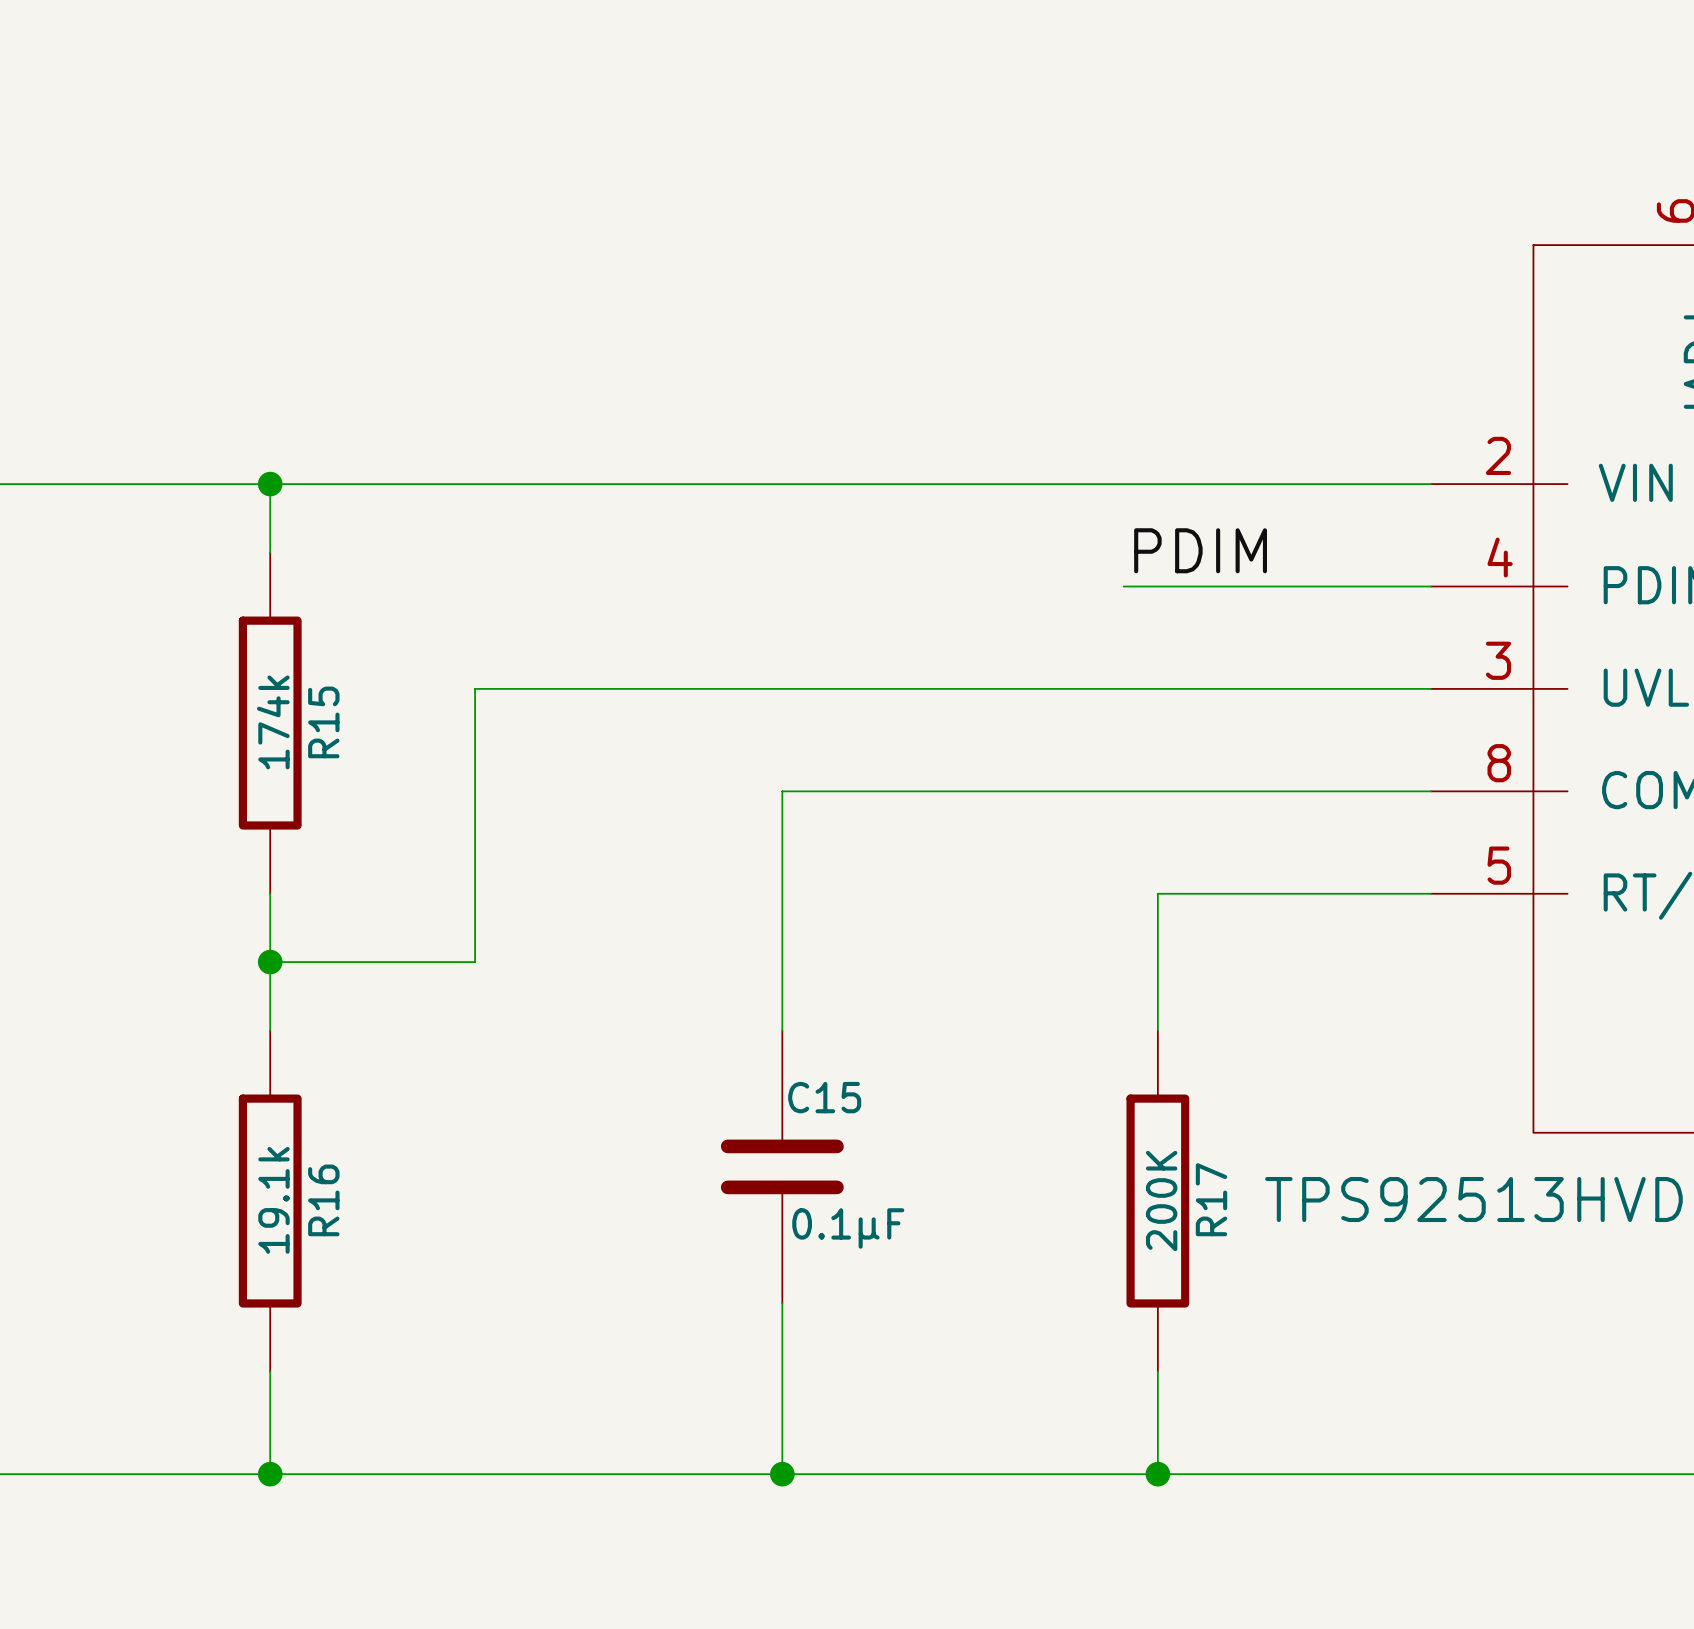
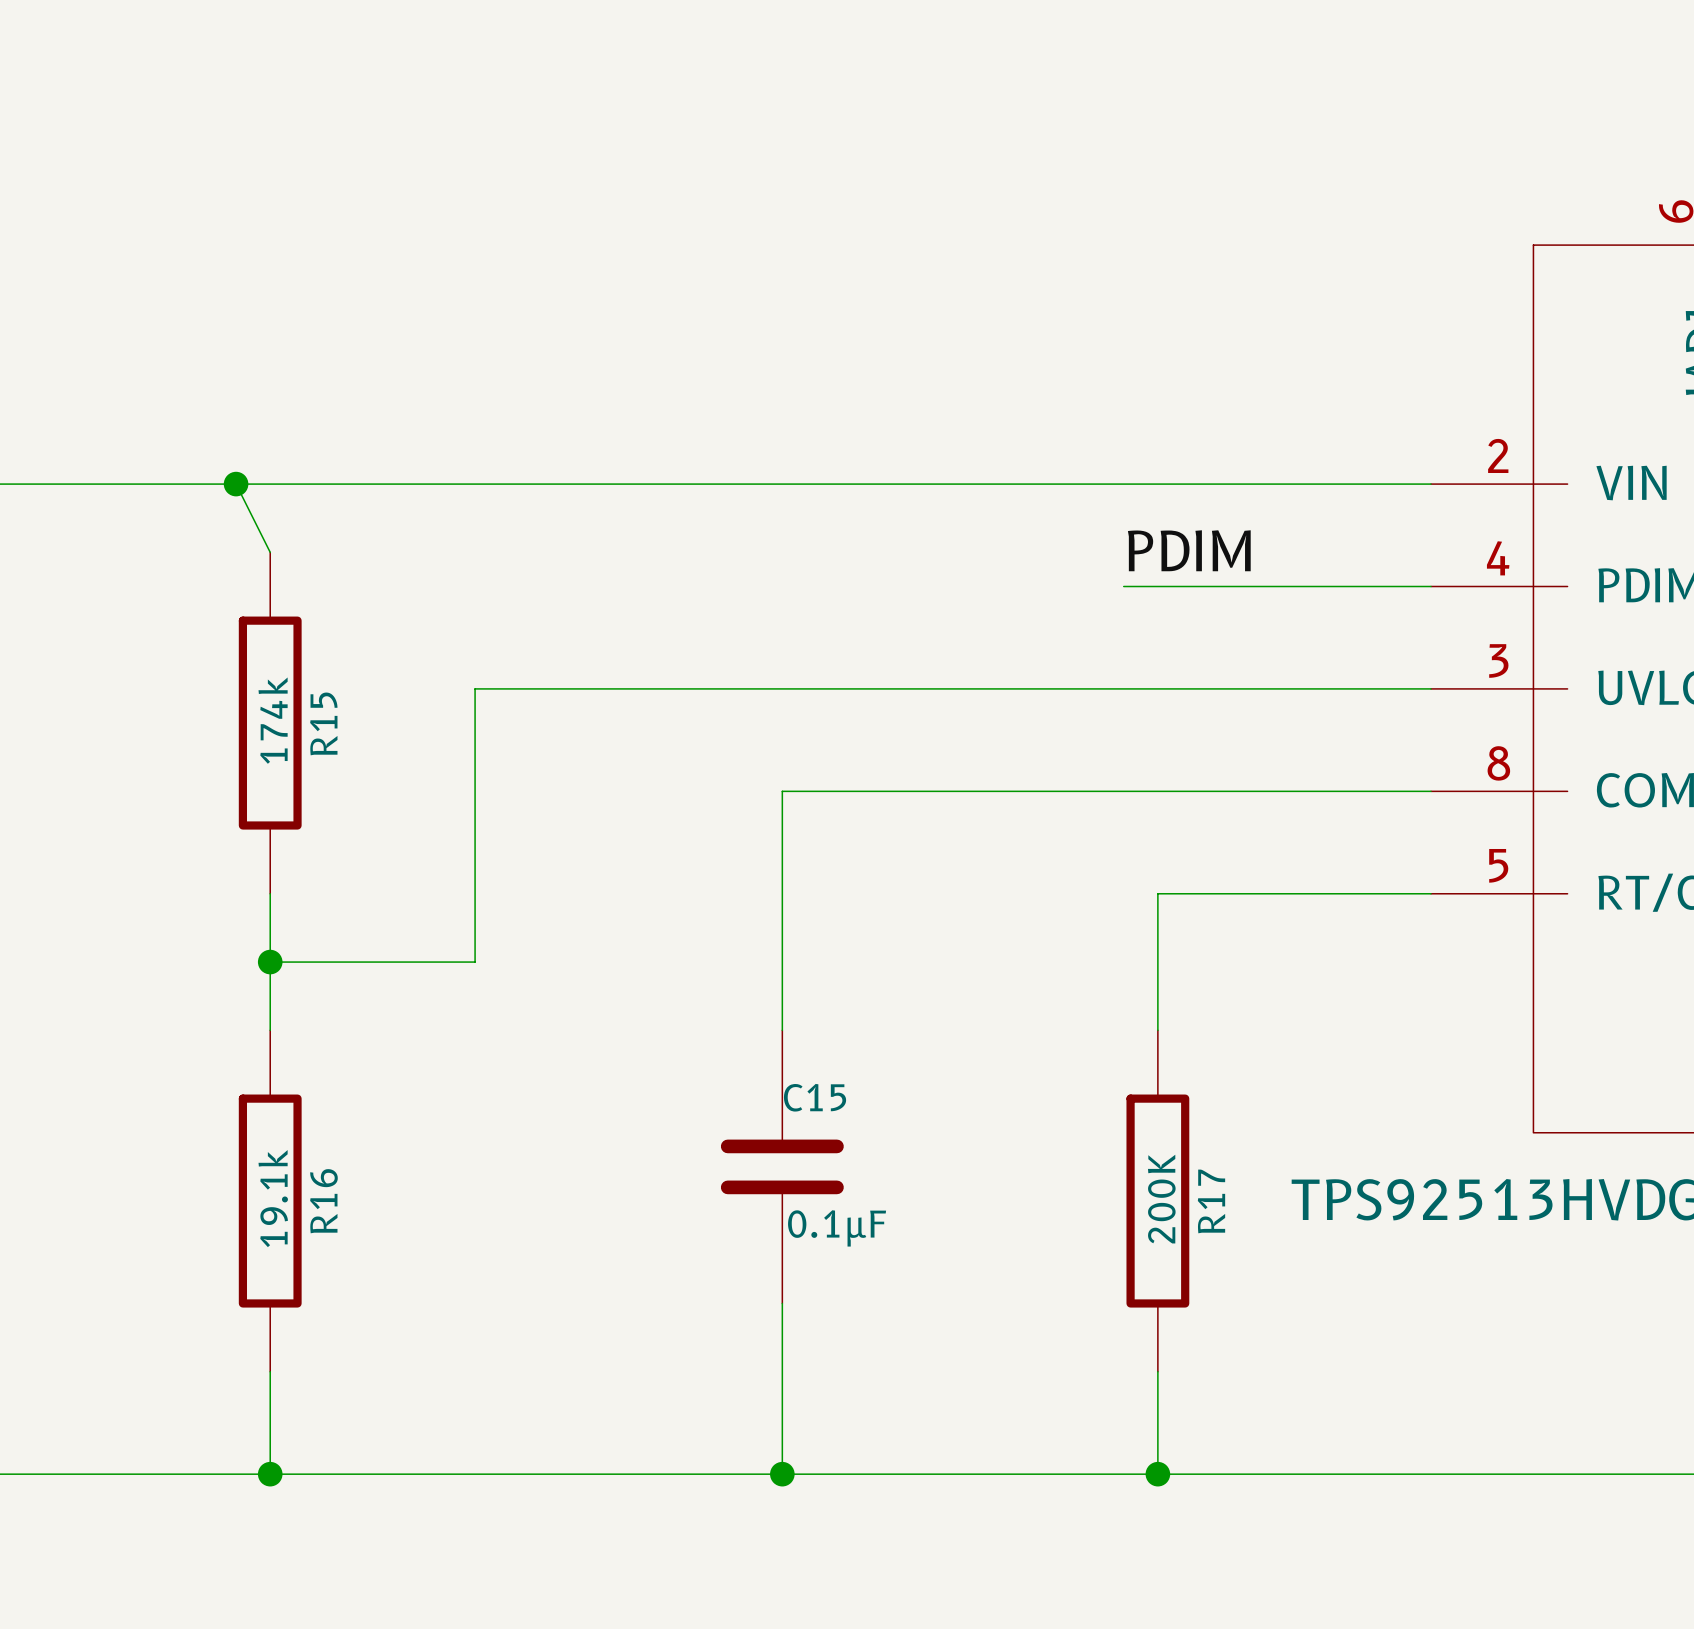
wire: (270, 484) (270, 552) -> (236, 484) (270, 552)
junction position: (270, 484) -> (236, 484)

